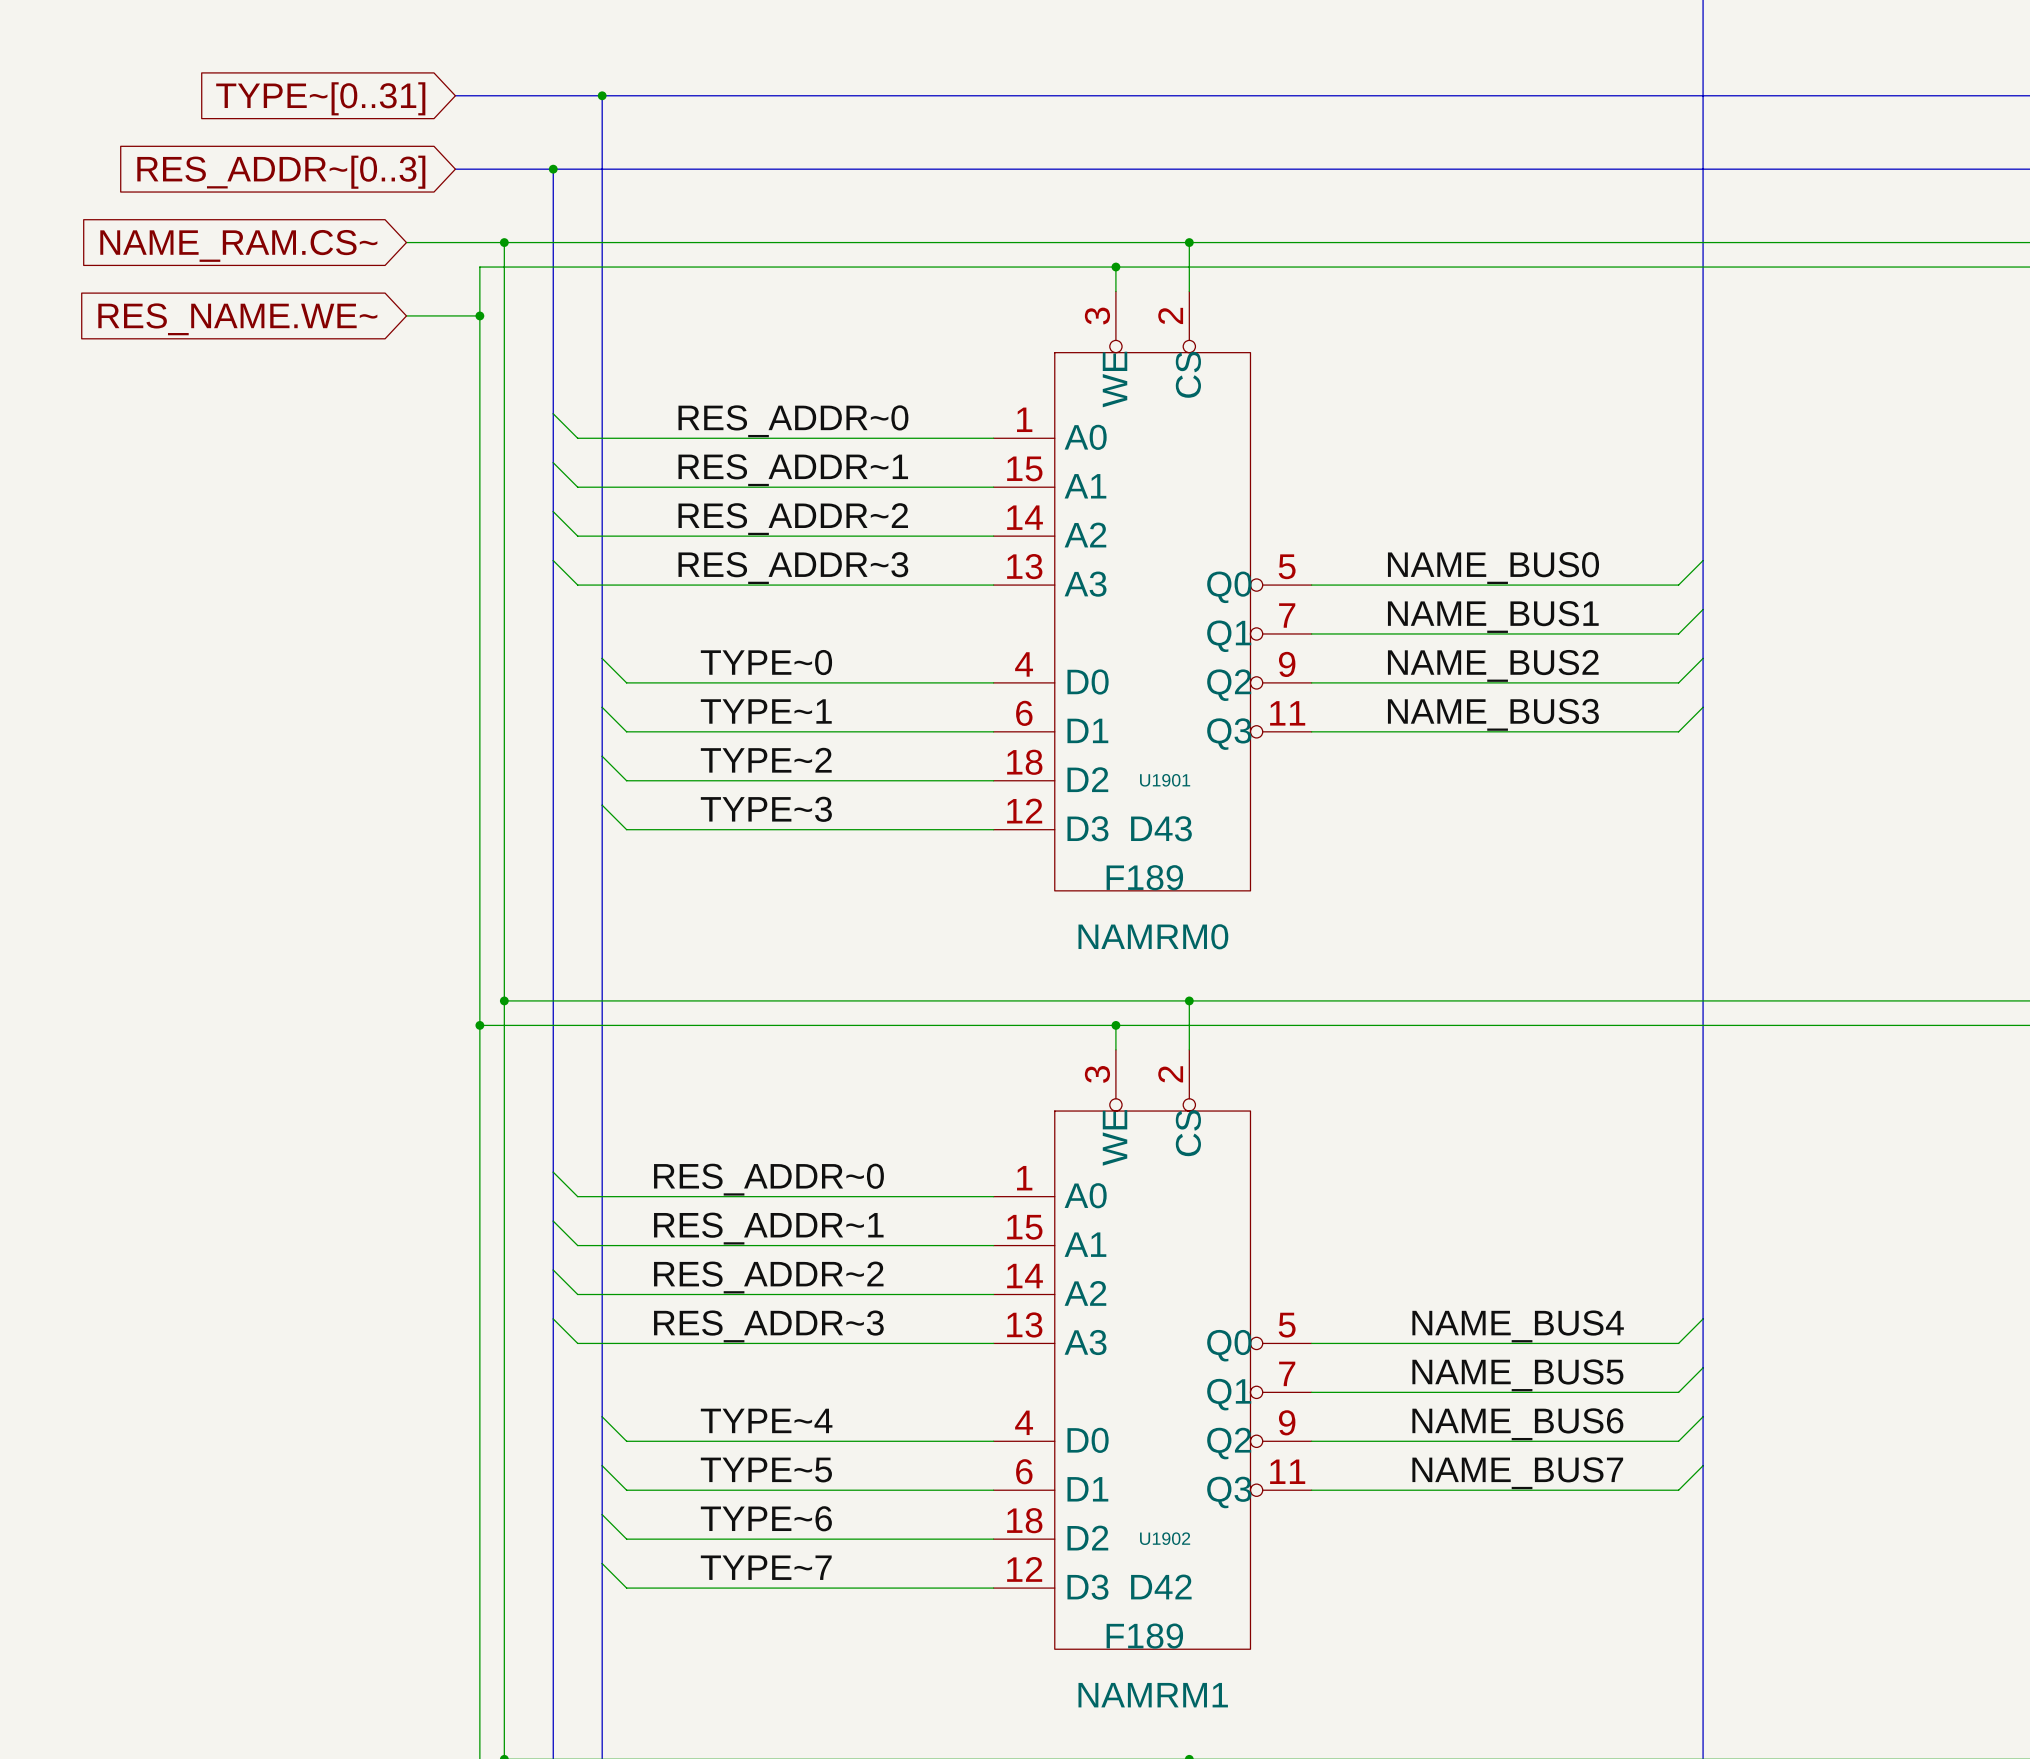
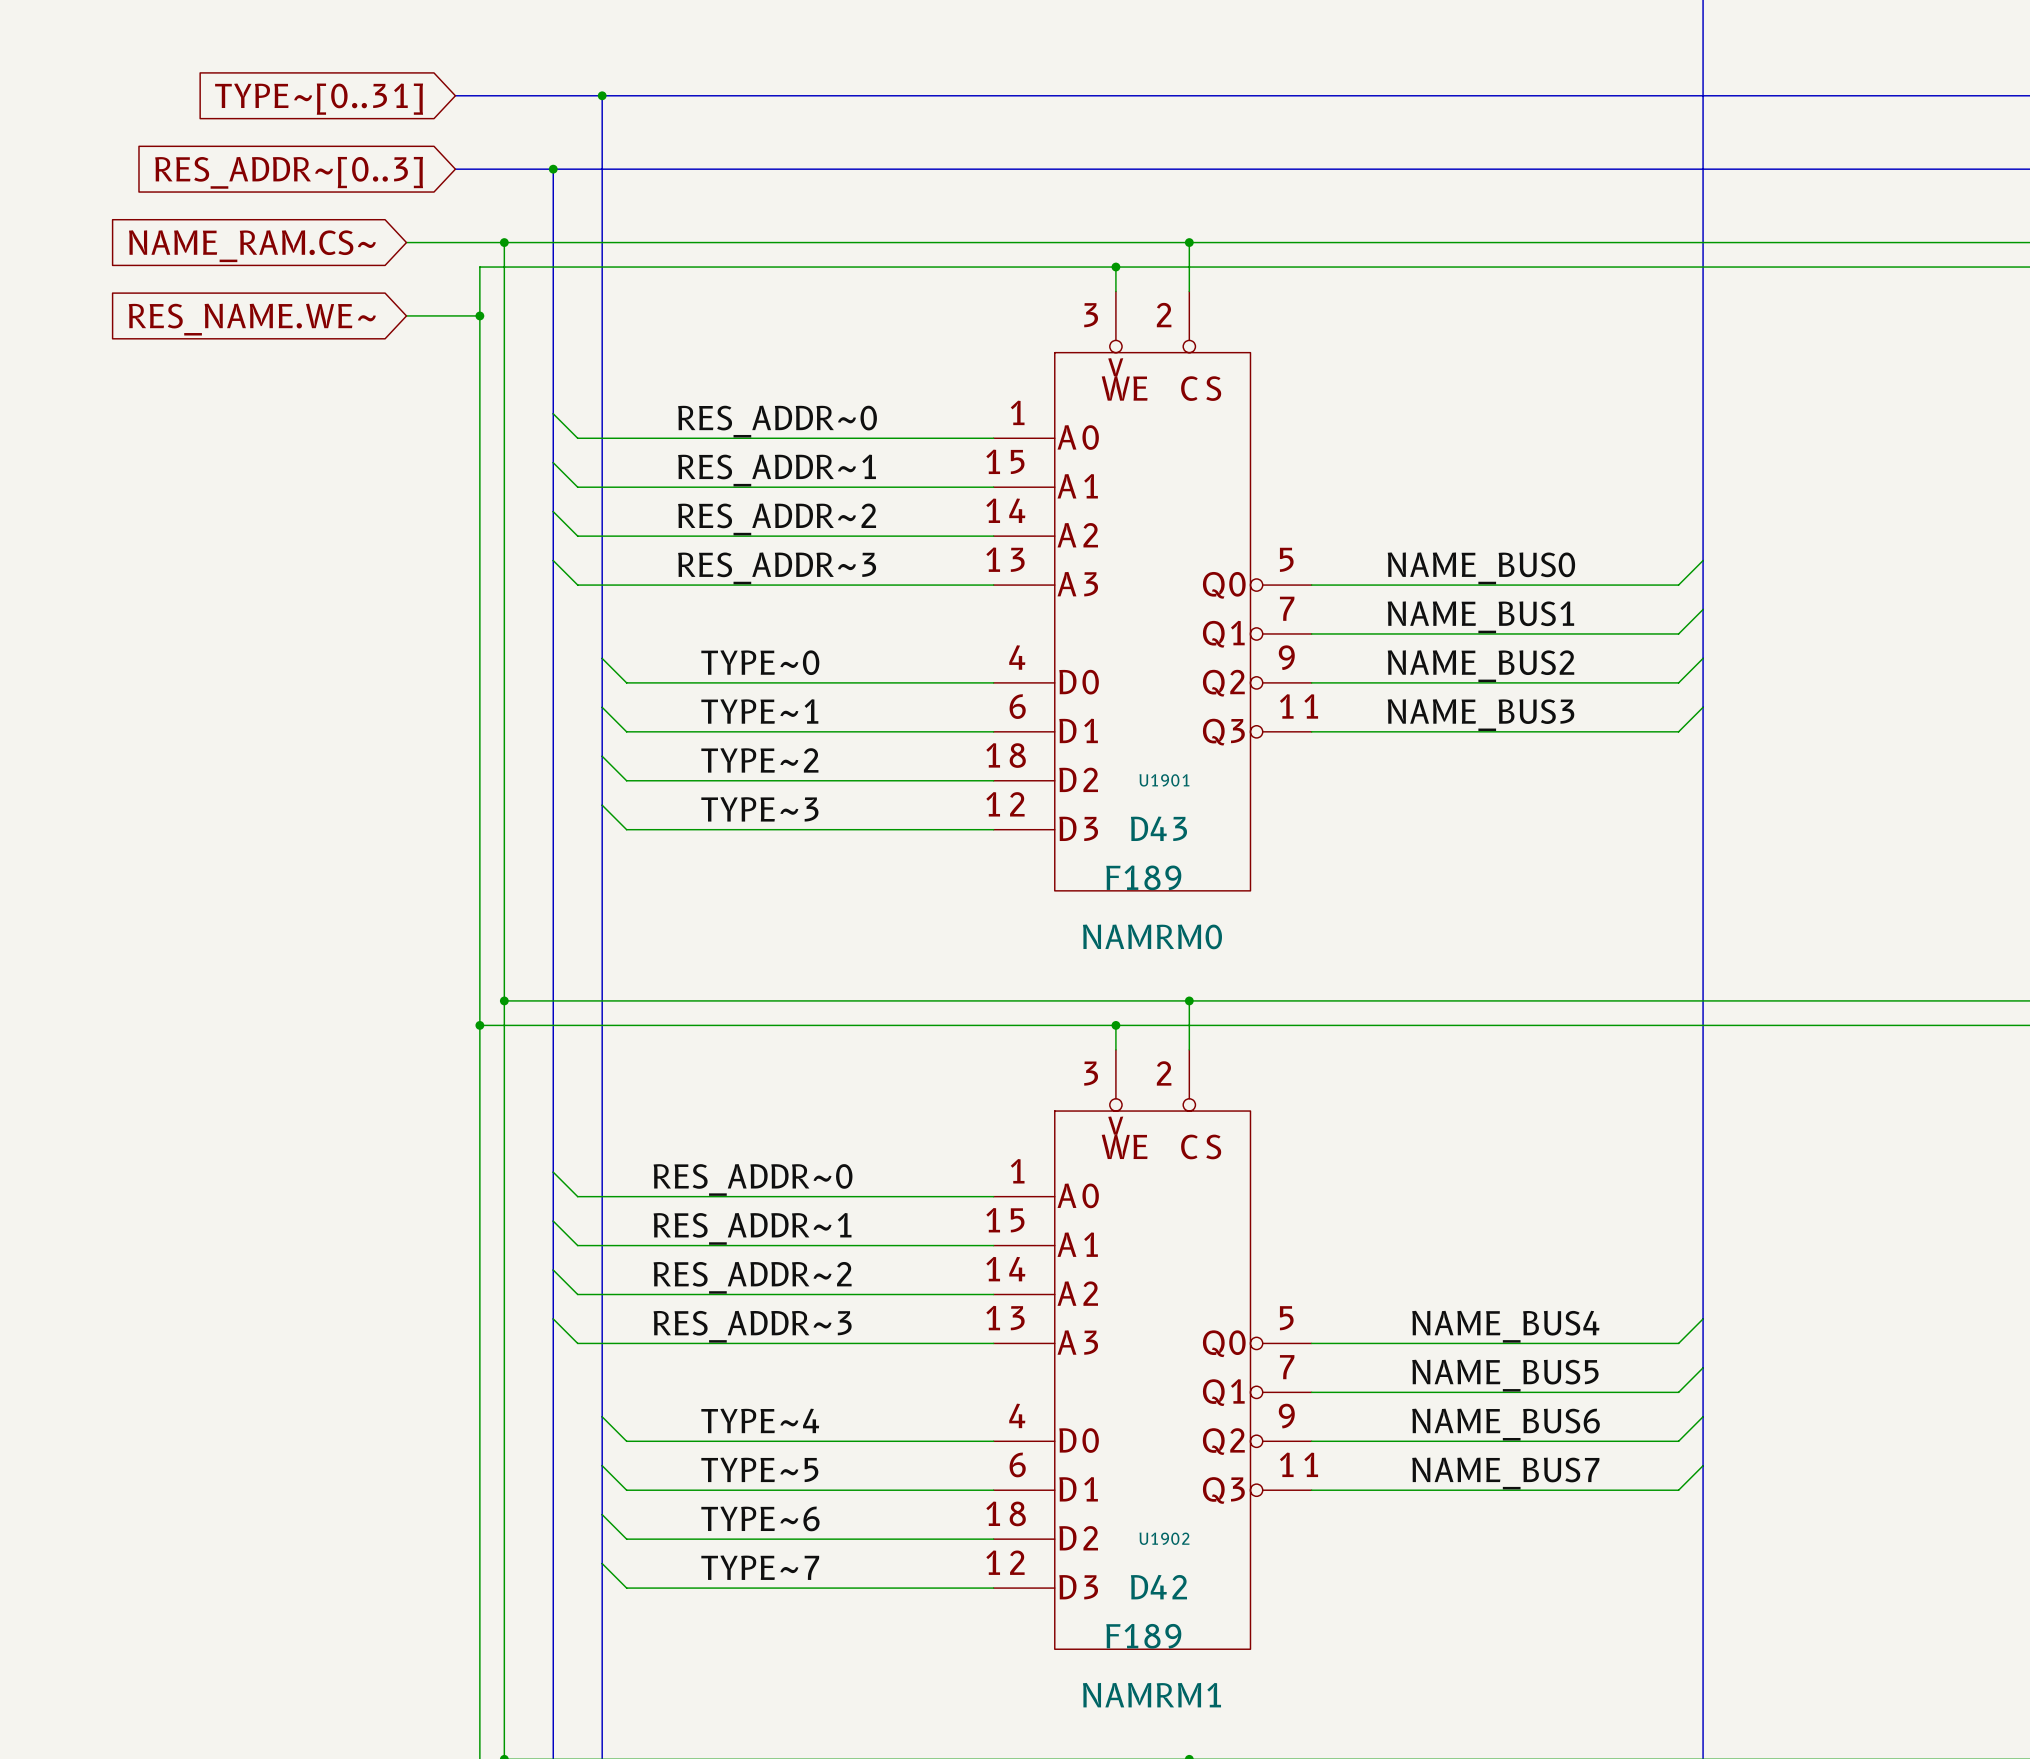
U1901 symbol: [993, 291, 1312, 891] -> [993, 291, 1312, 891]
U1902 symbol: [993, 1049, 1312, 1650] -> [993, 1049, 1312, 1650]

